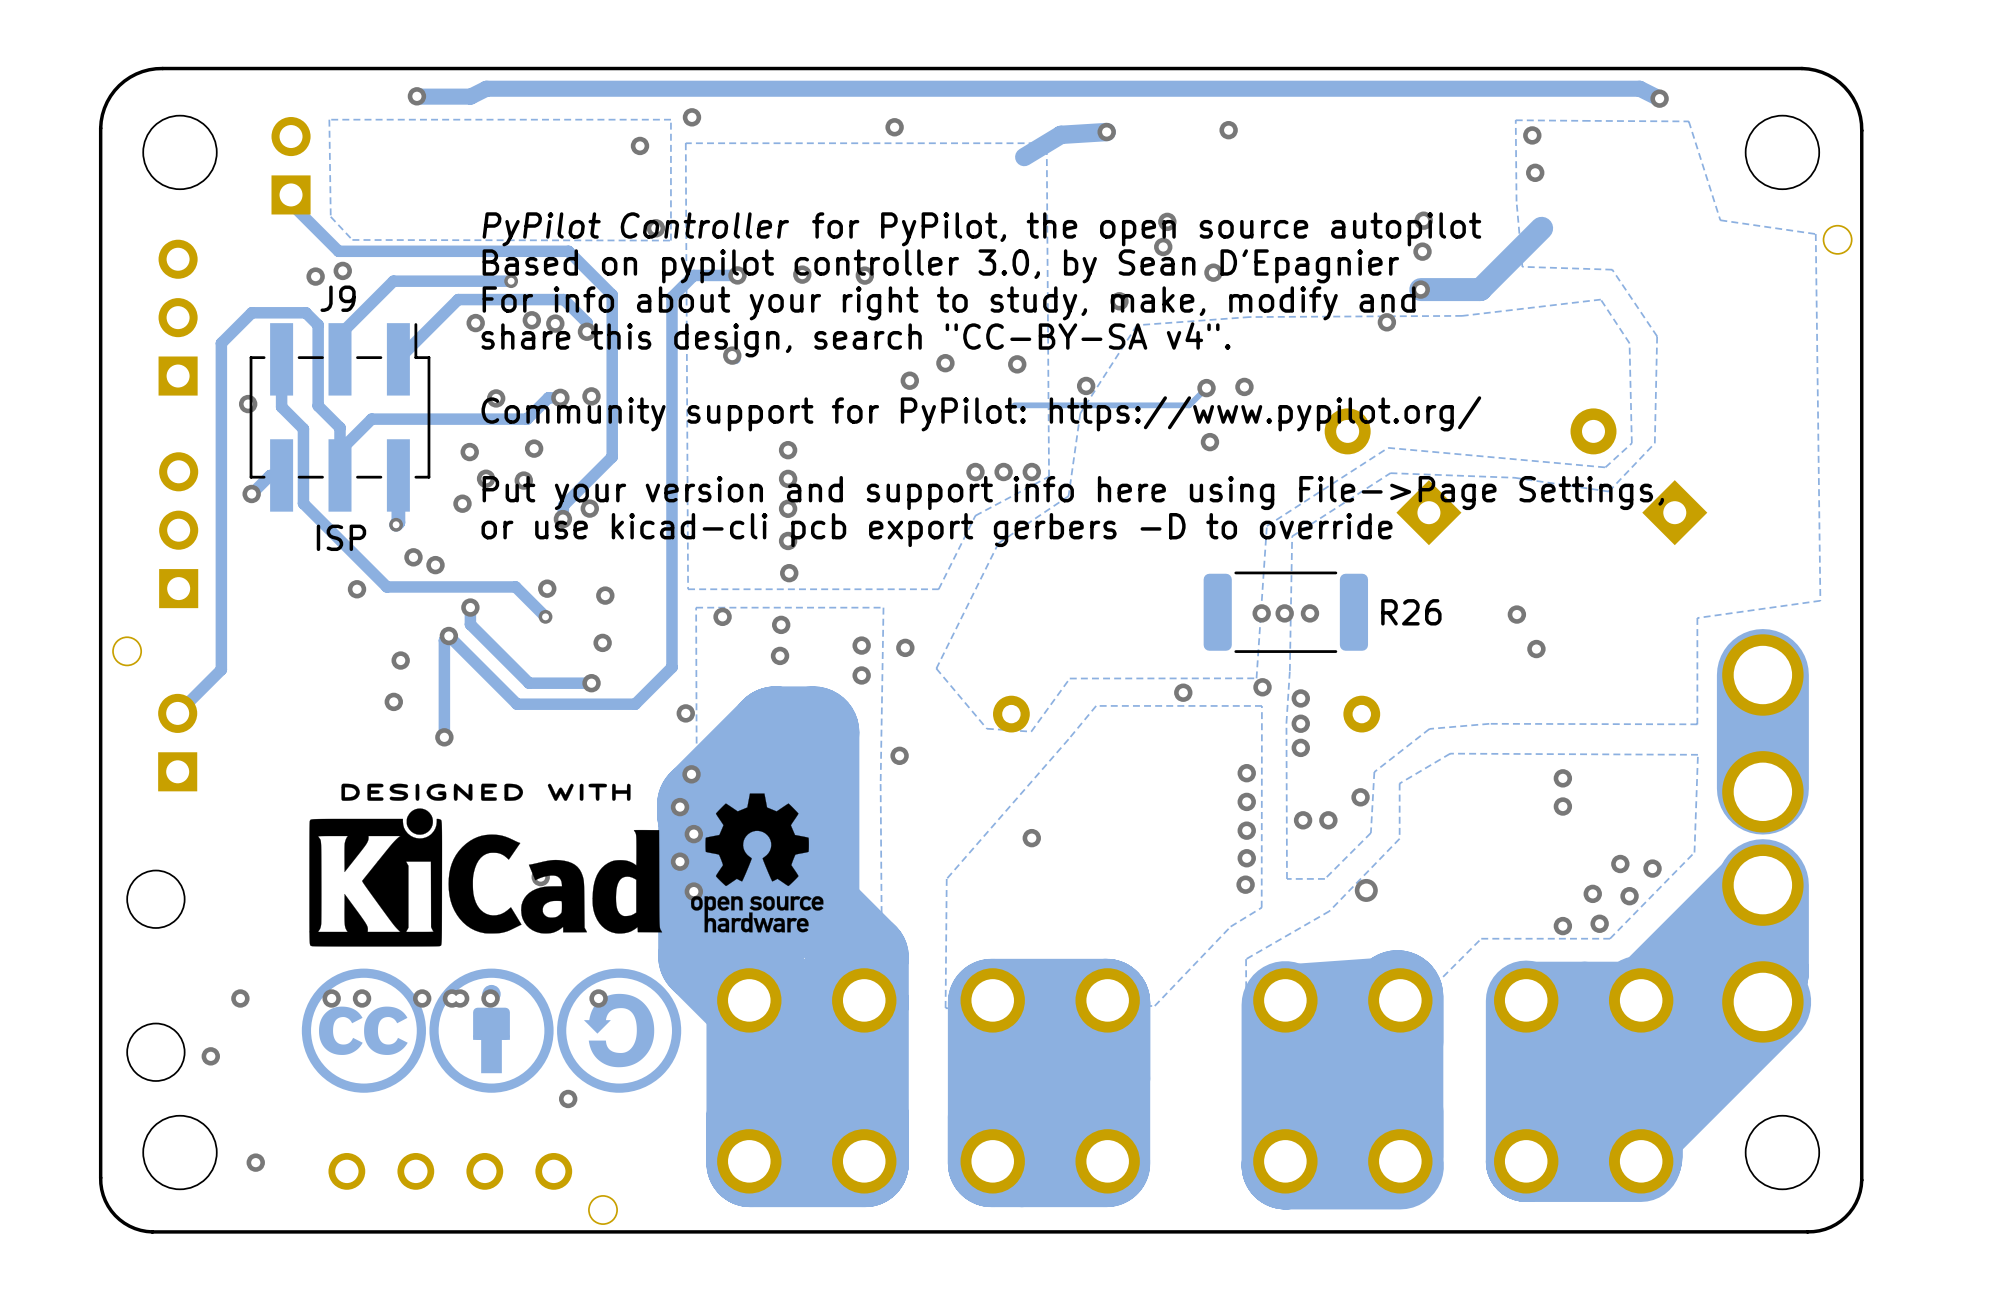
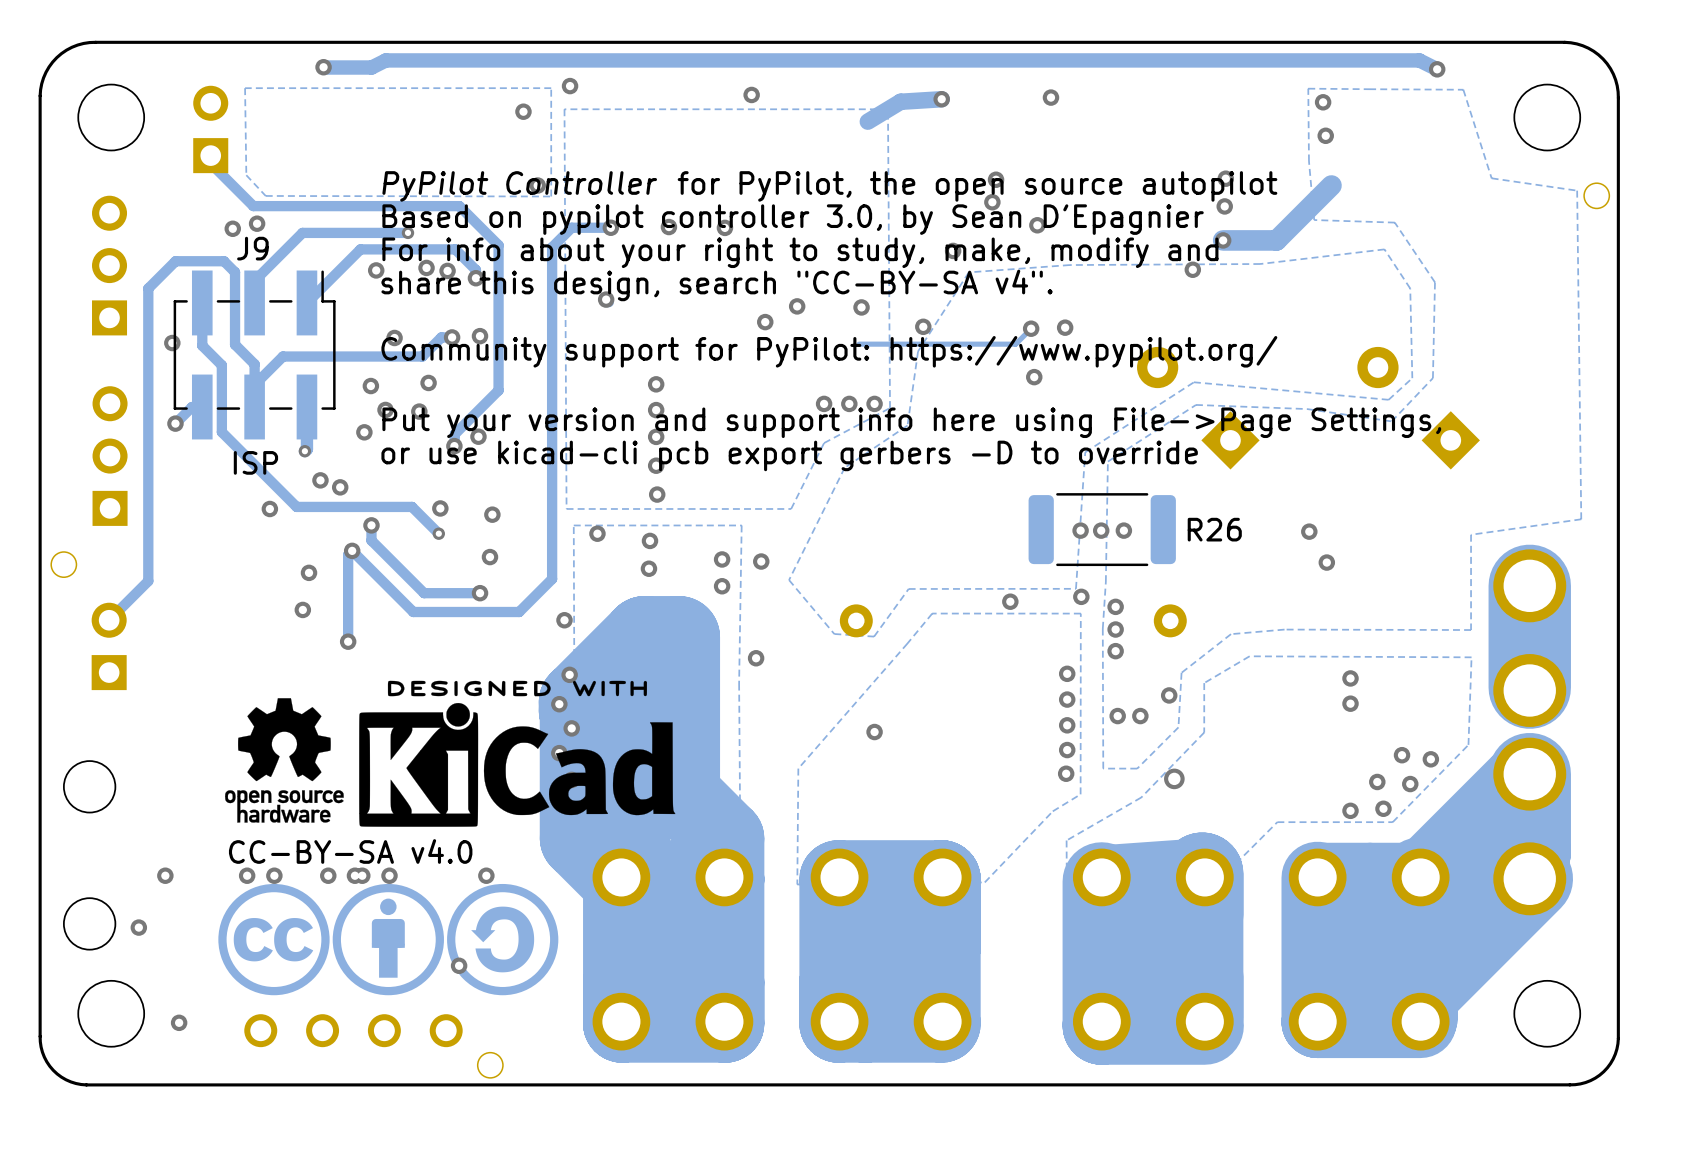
drawing position: (757, 862) -> (284, 760)
drawing position: (485, 865) -> (517, 753)
text: none -> CC-BY-SA v4.0 (350, 851)
drawing position: (363, 1030) -> (273, 939)
drawing position: (491, 1030) -> (388, 939)
drawing position: (619, 1030) -> (502, 939)

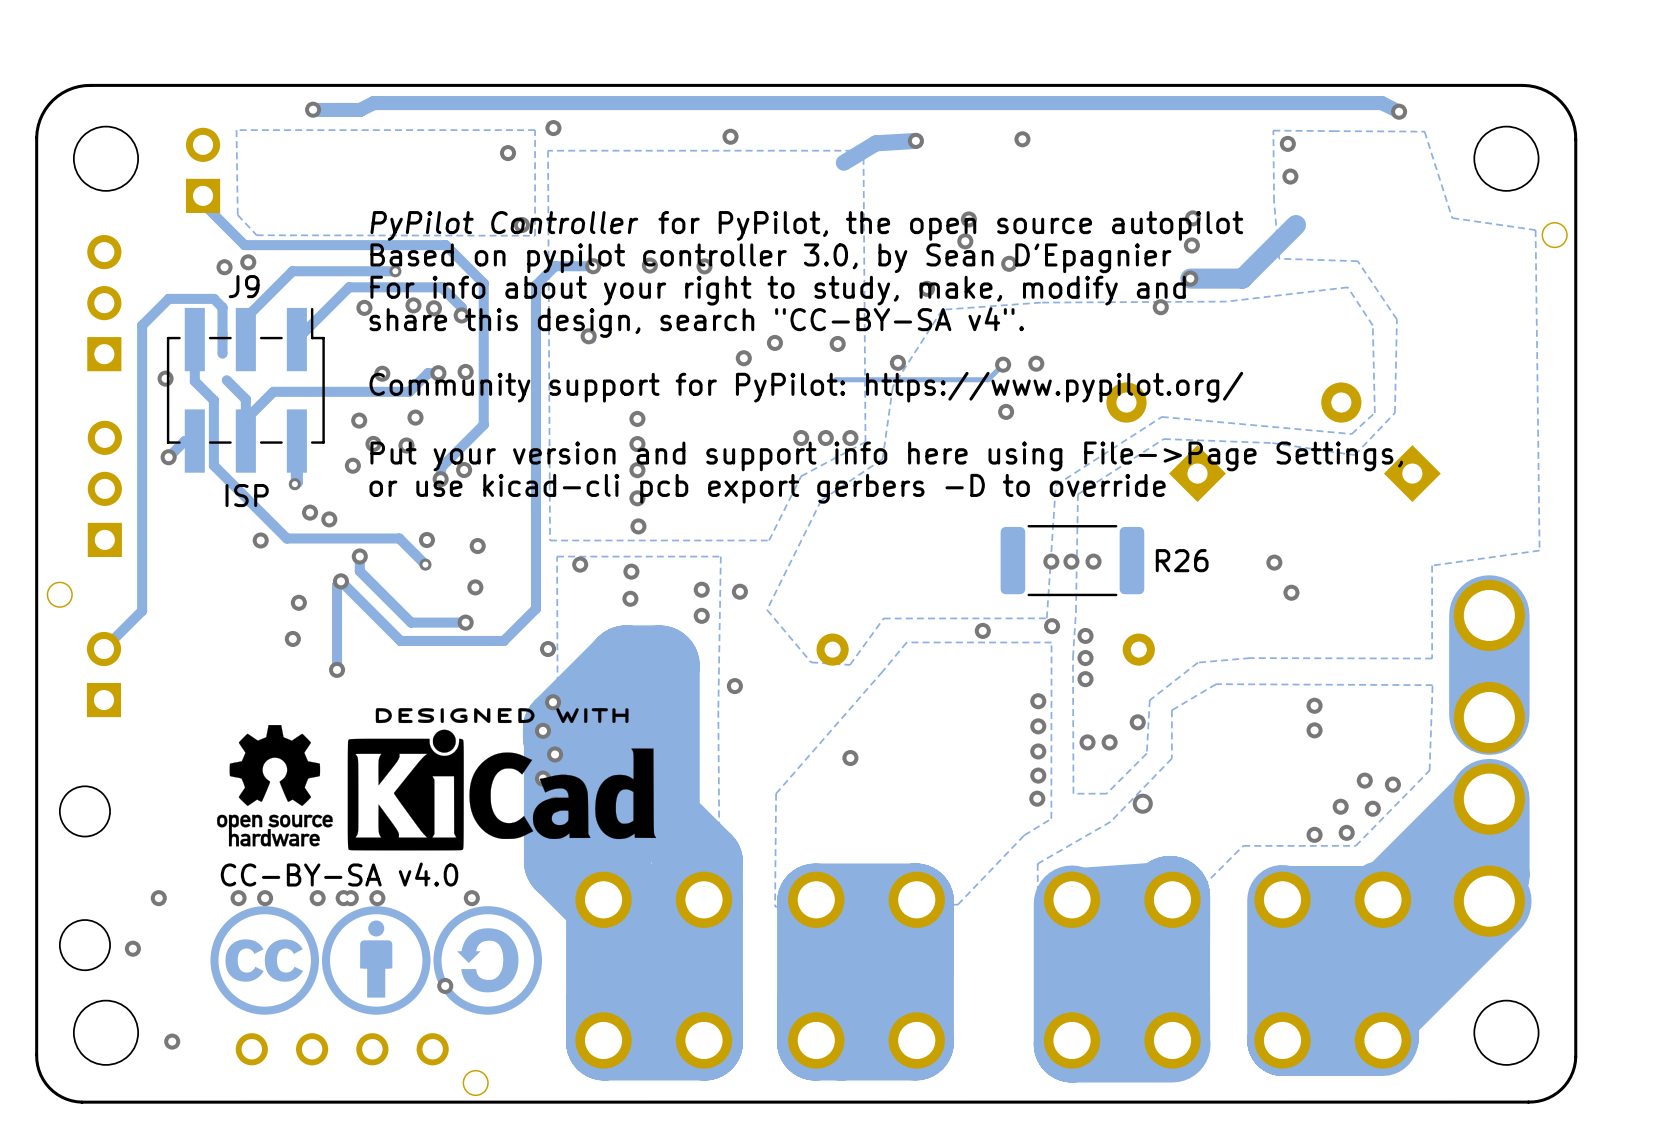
track: (221, 261) (235, 272) (235, 344) -> (213, 298) (222, 307) (222, 333)
part: none -> (222, 343)

